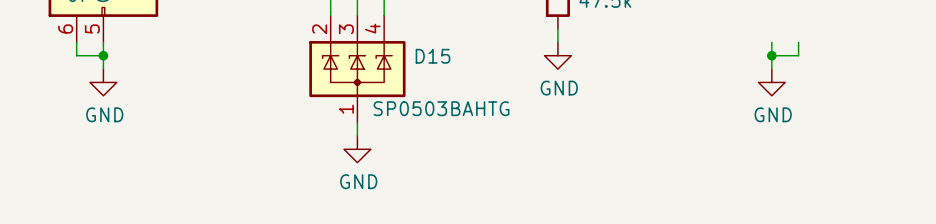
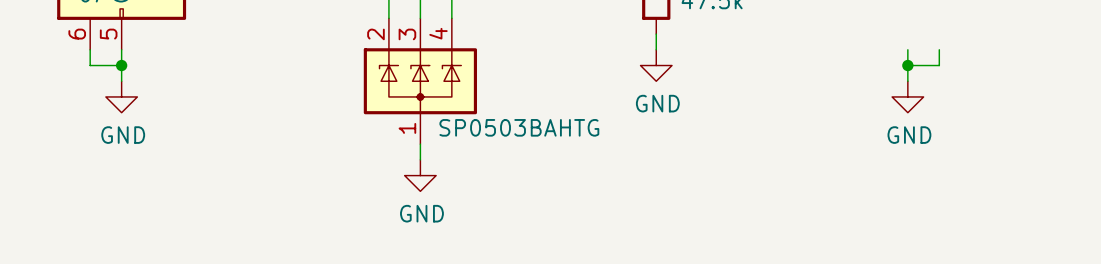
D15 name: D15 (433, 56) -> none

